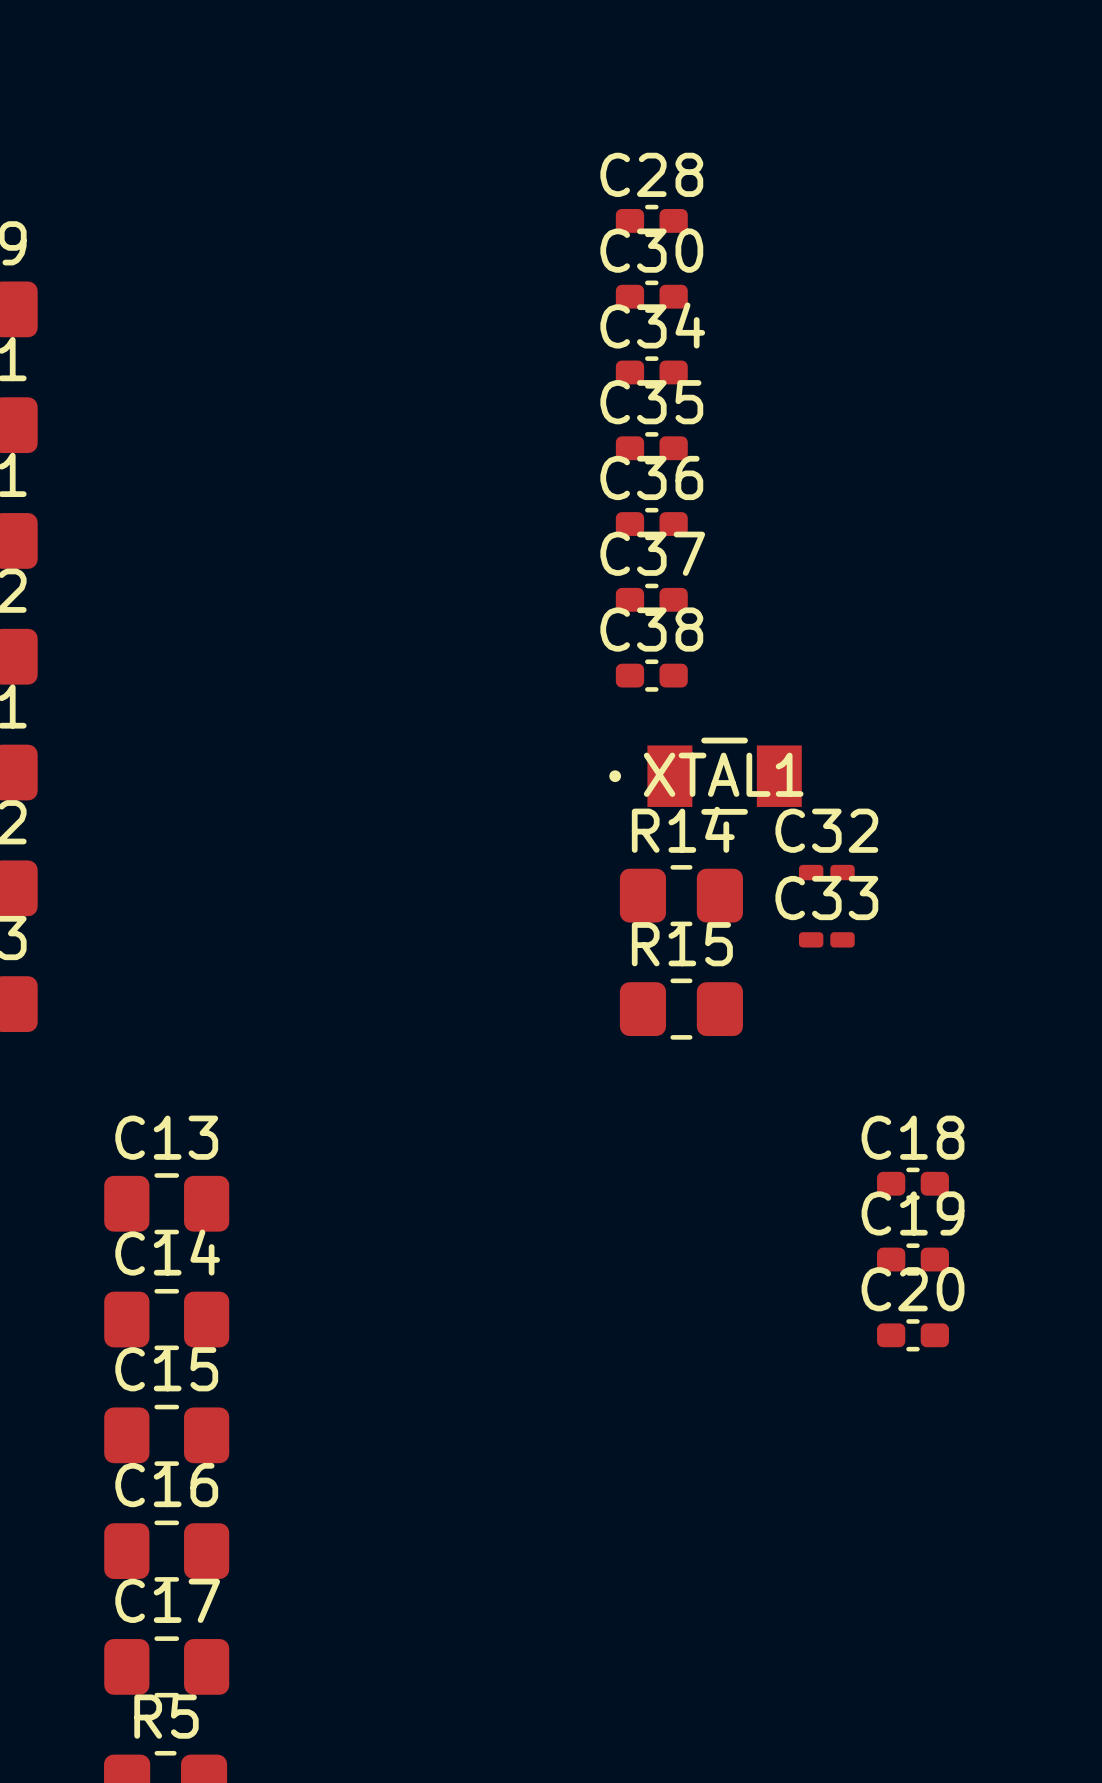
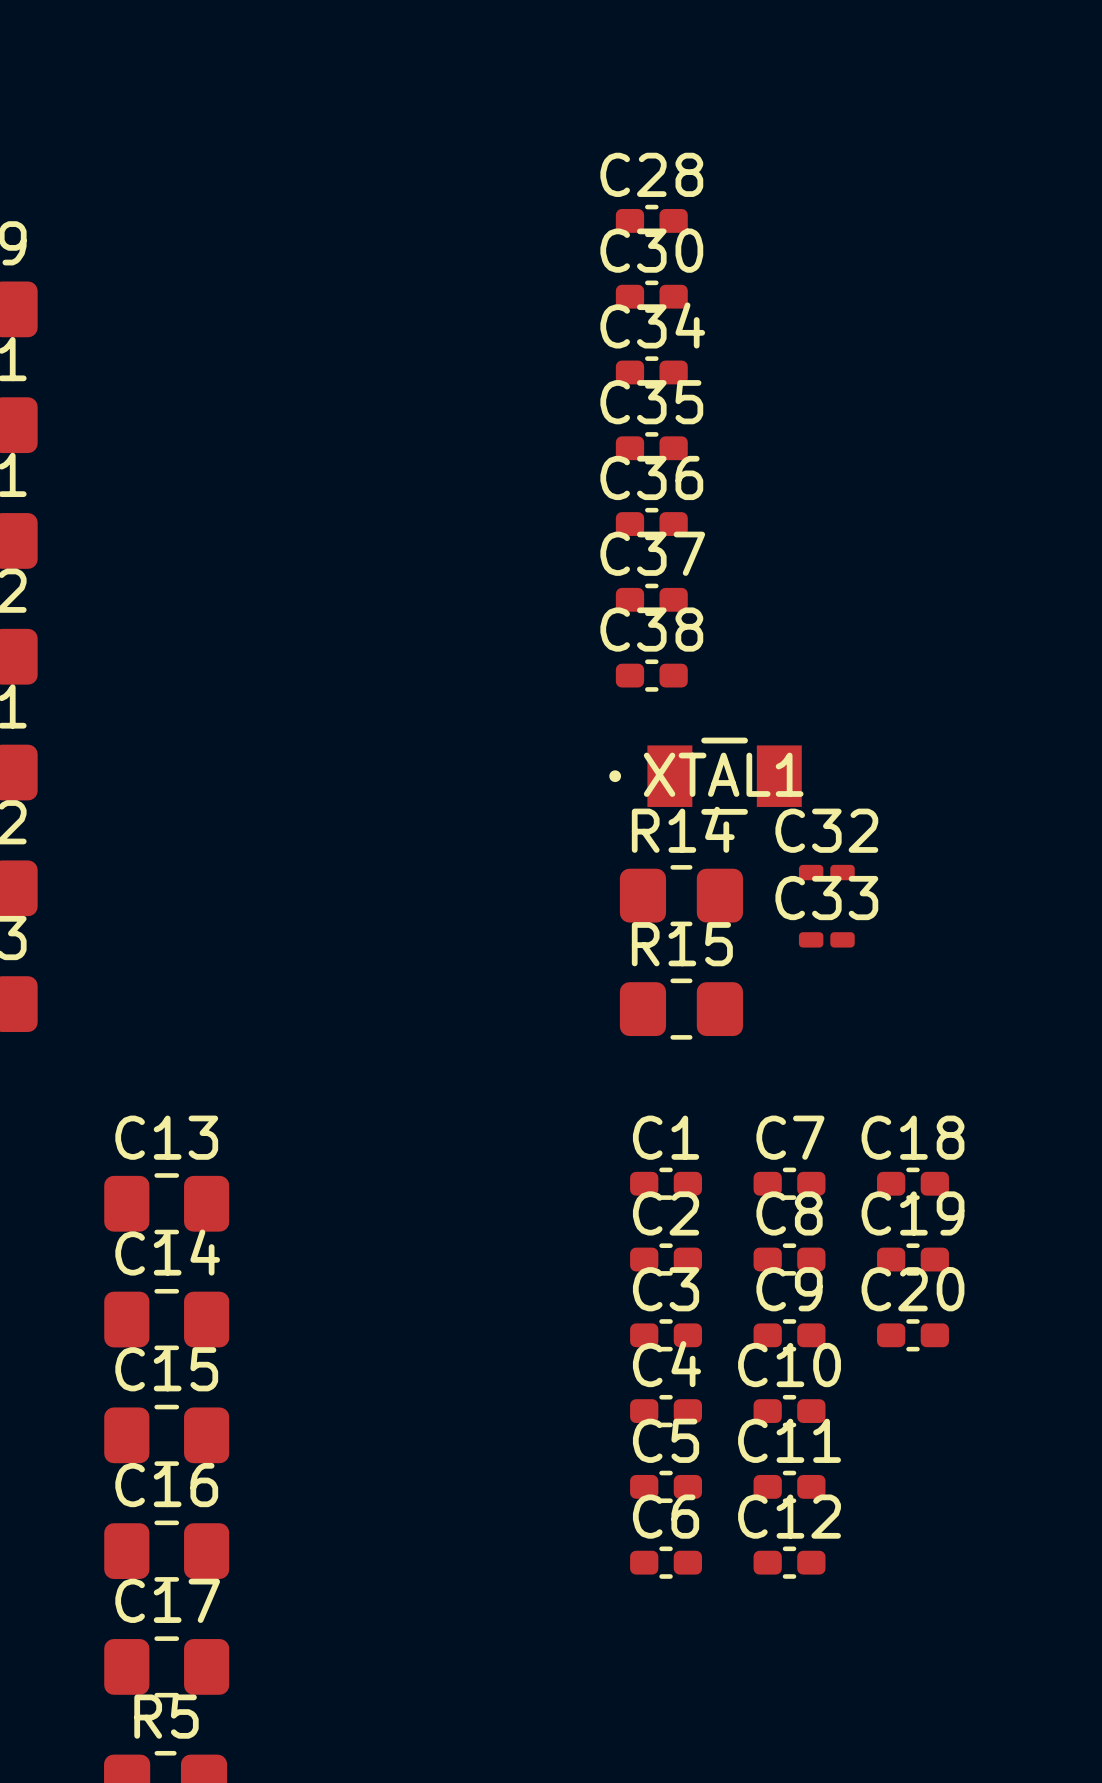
C1: none -> (666, 1183)
C7: none -> (789, 1183)
C2: none -> (666, 1259)
C8: none -> (789, 1259)
C3: none -> (666, 1335)
C9: none -> (789, 1335)
C4: none -> (666, 1411)
C10: none -> (789, 1411)
C5: none -> (666, 1486)
C11: none -> (789, 1486)
C6: none -> (666, 1562)
C12: none -> (789, 1562)

